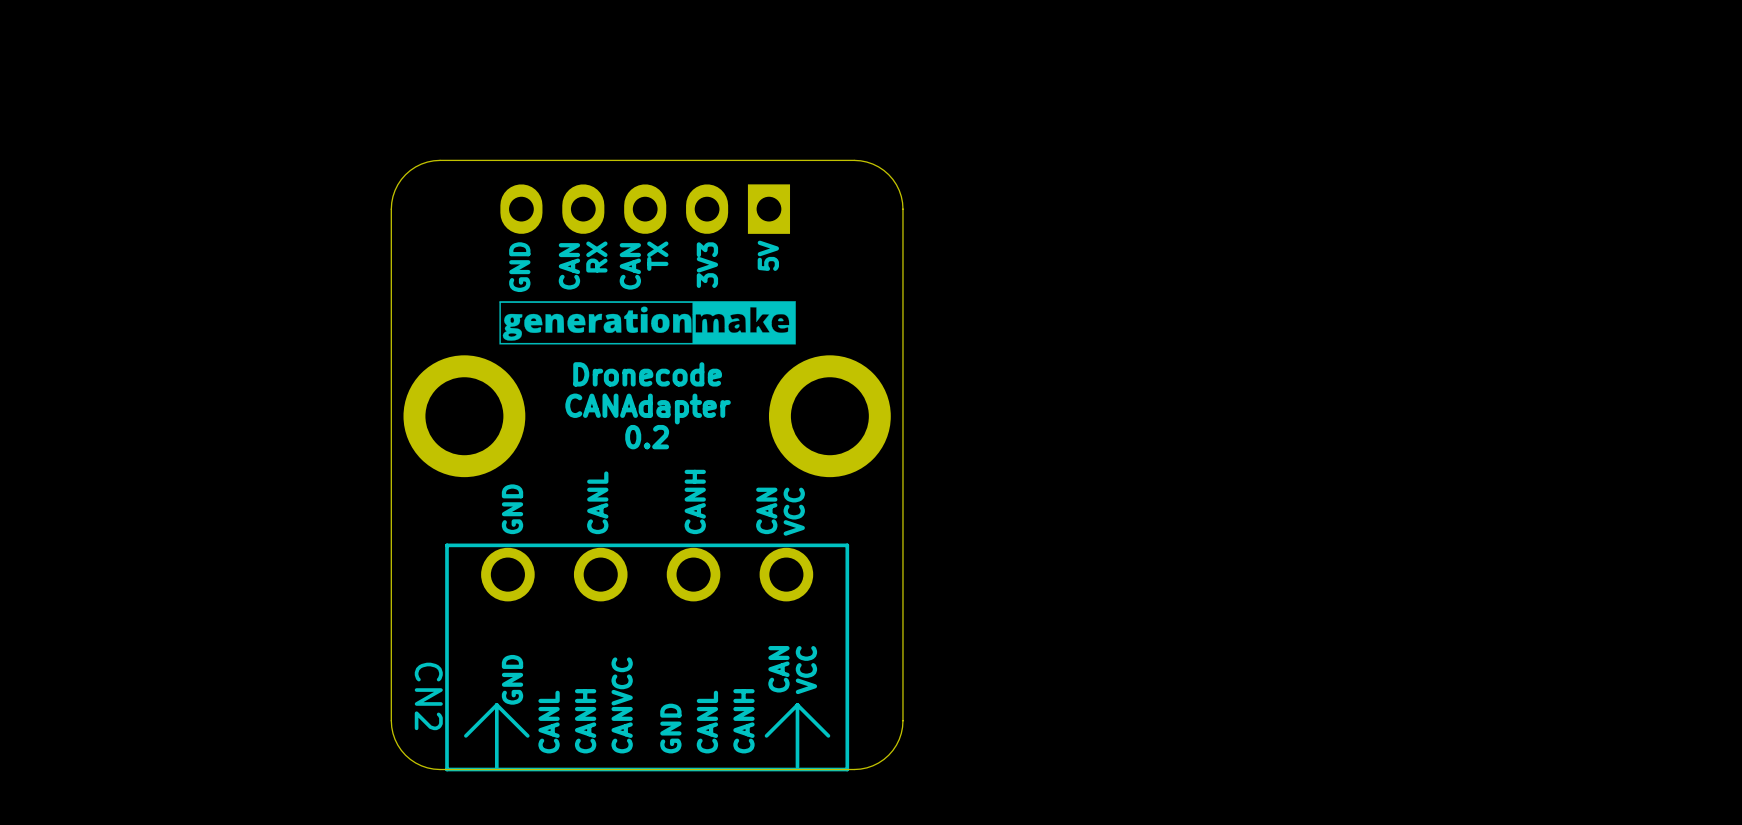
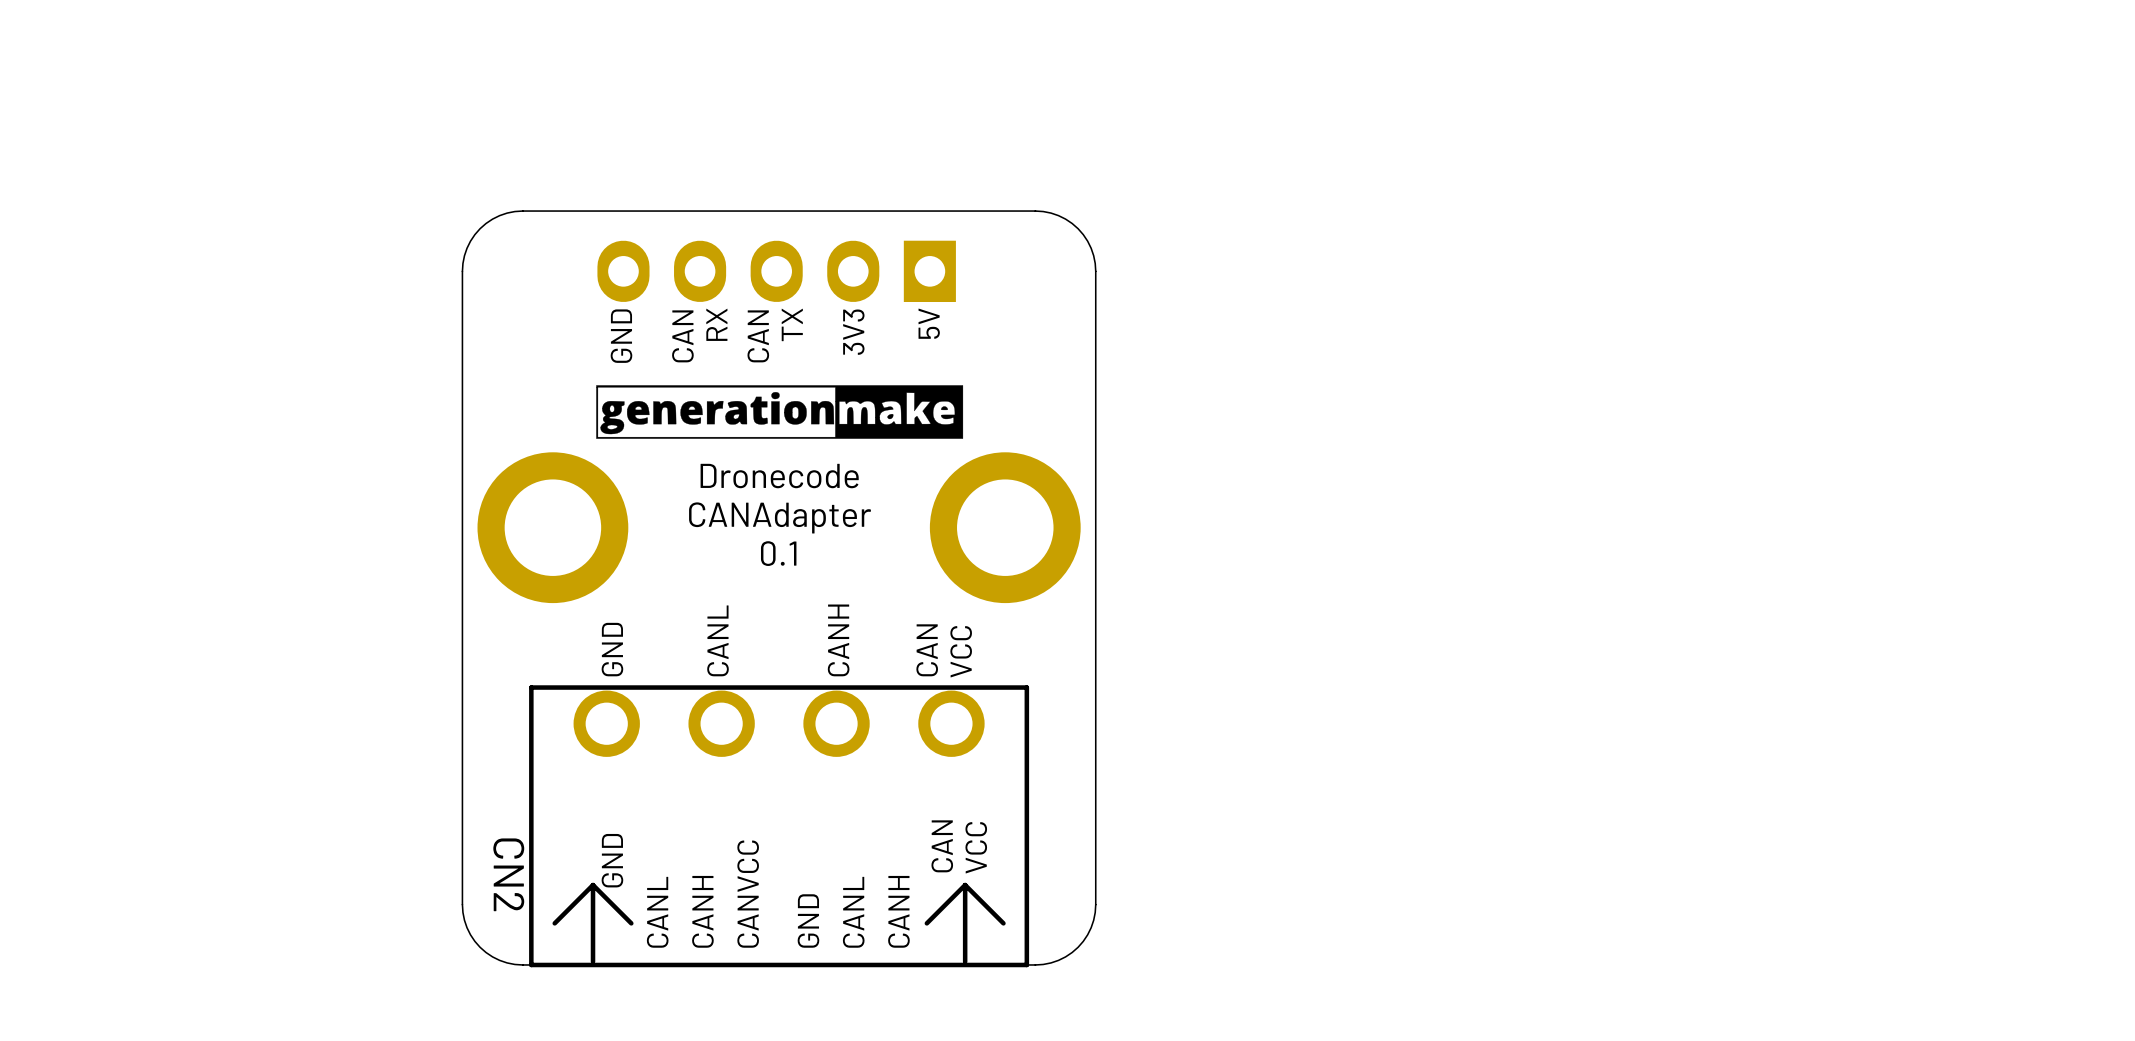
text: 0.2 (647, 437) -> 0.1 (778, 553)

